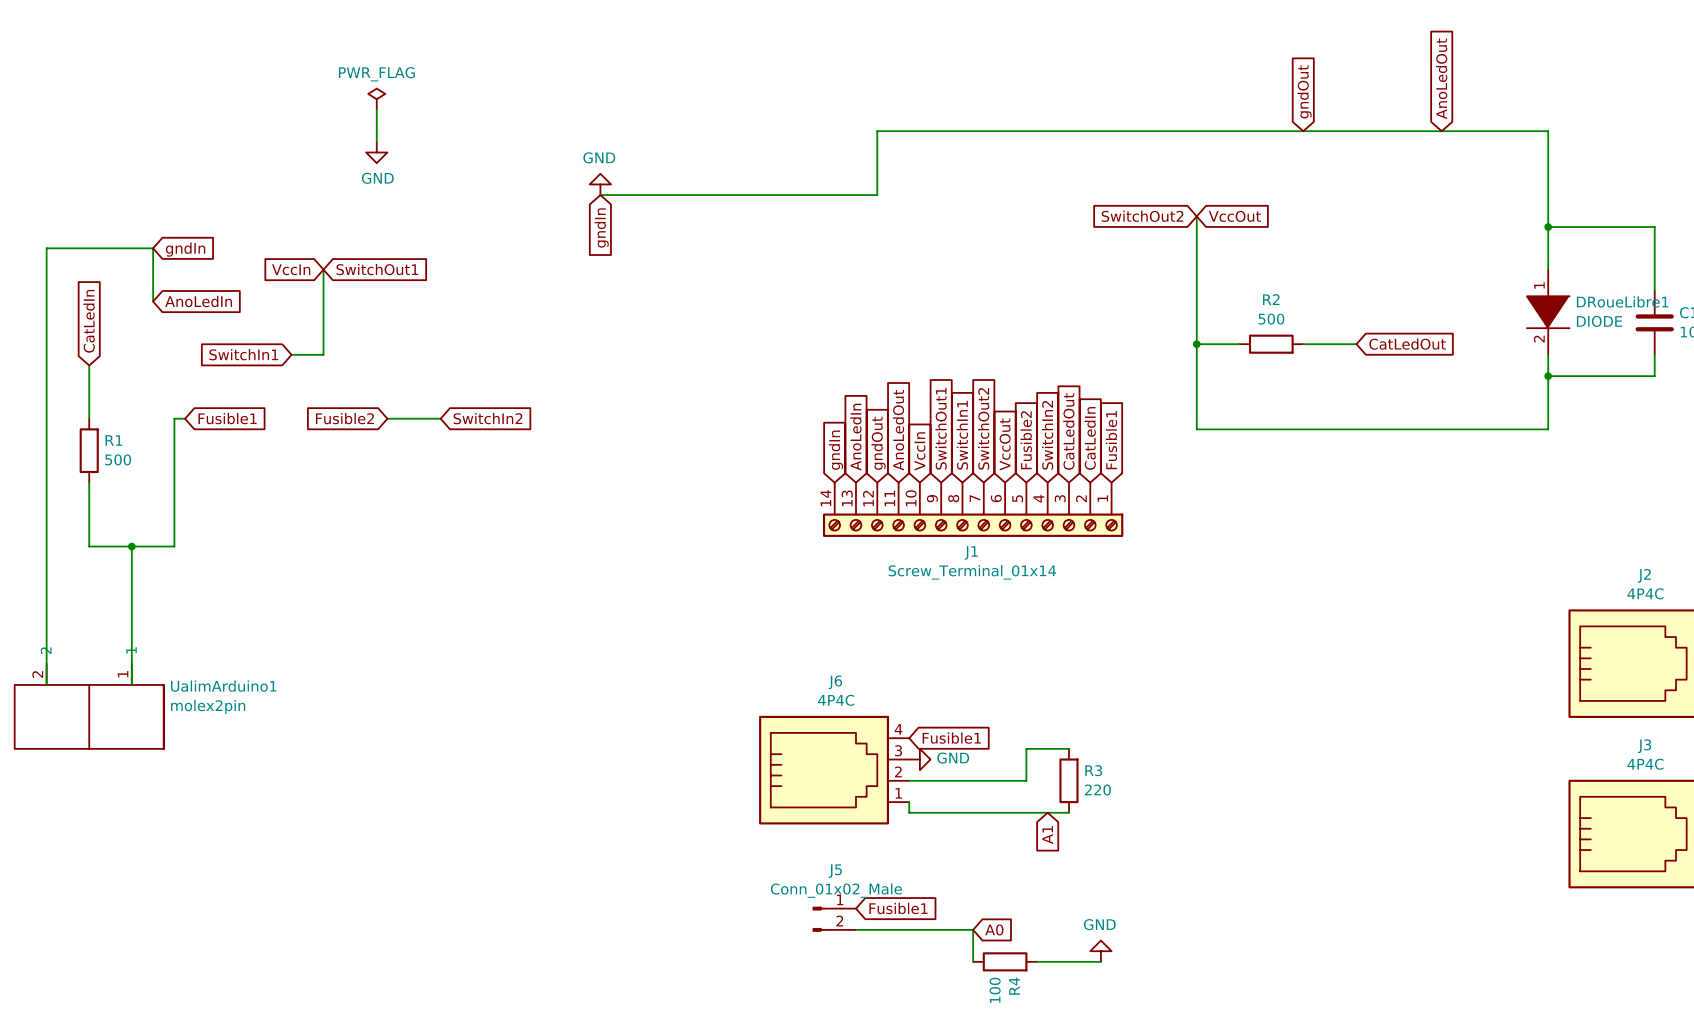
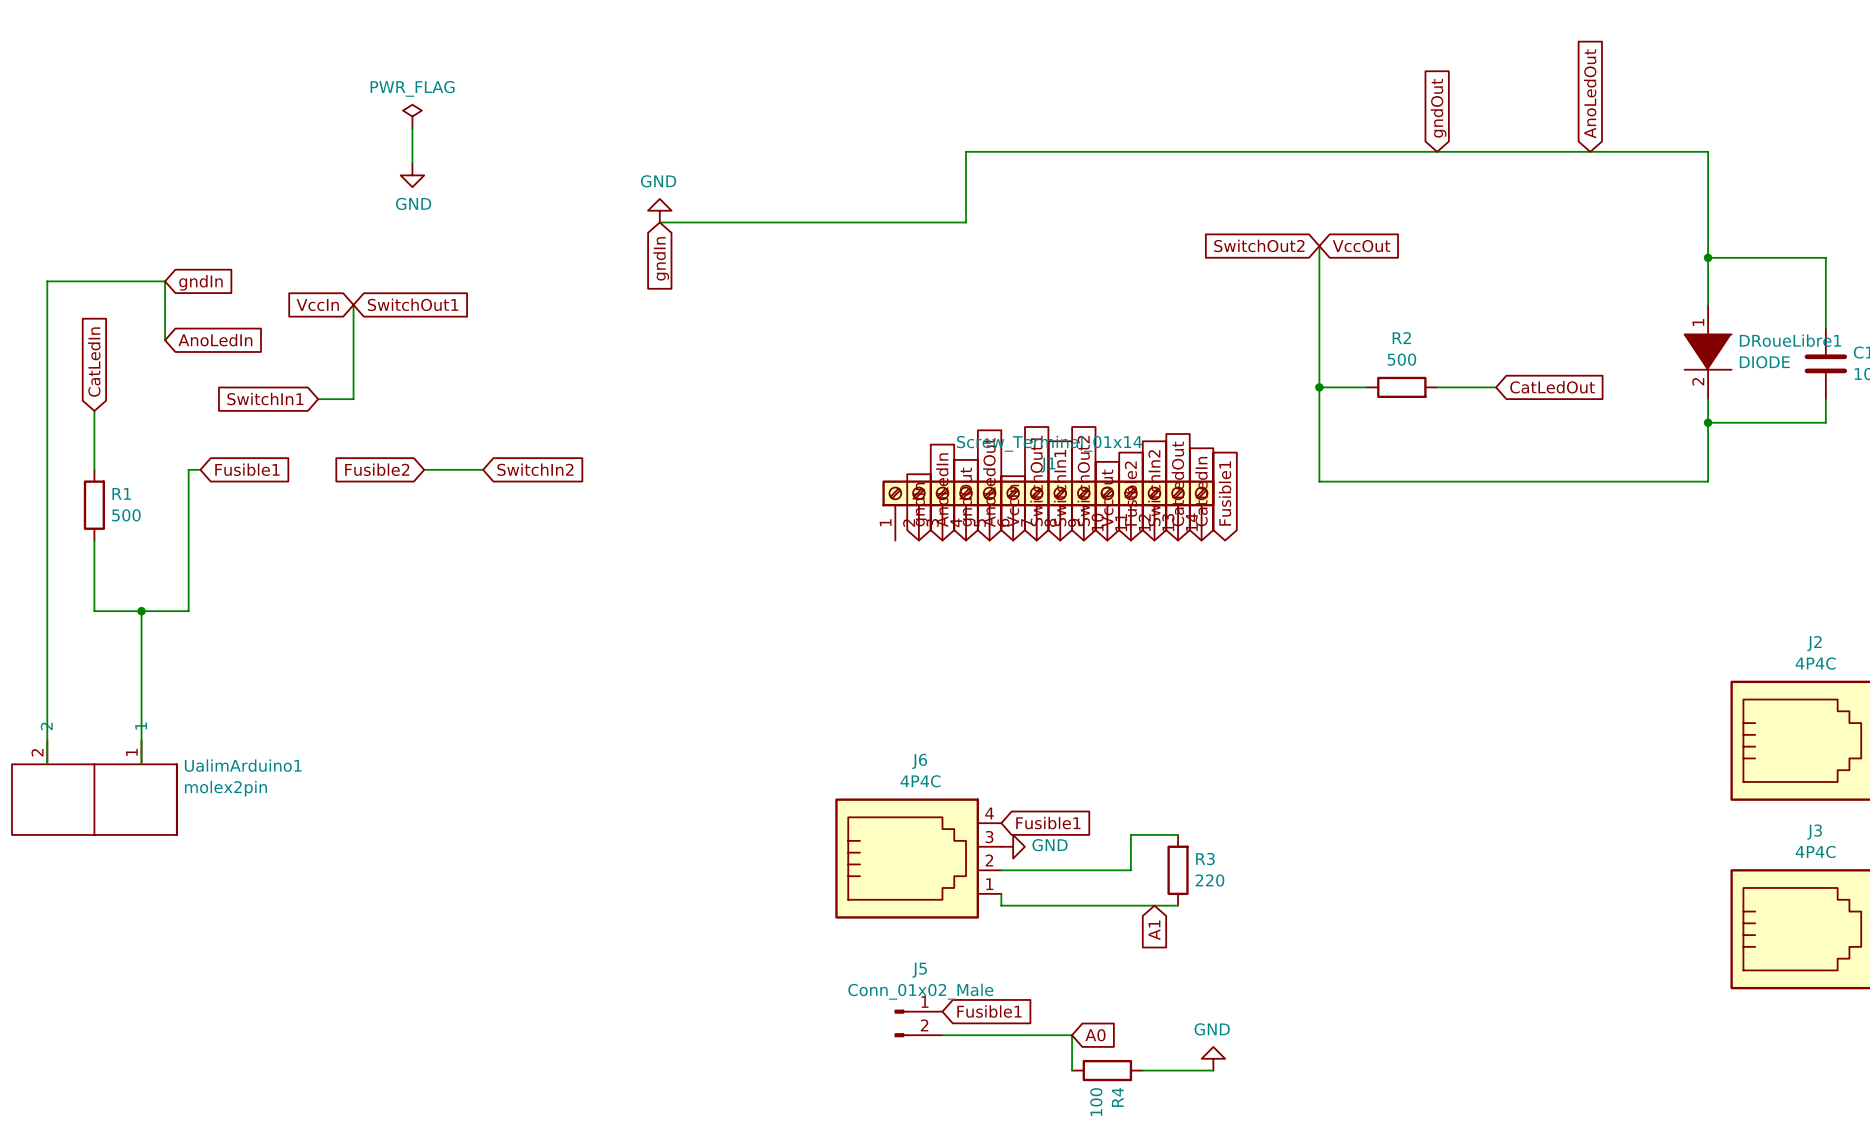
J1 rotation: 0° (973, 525) -> 180° (1048, 493)

